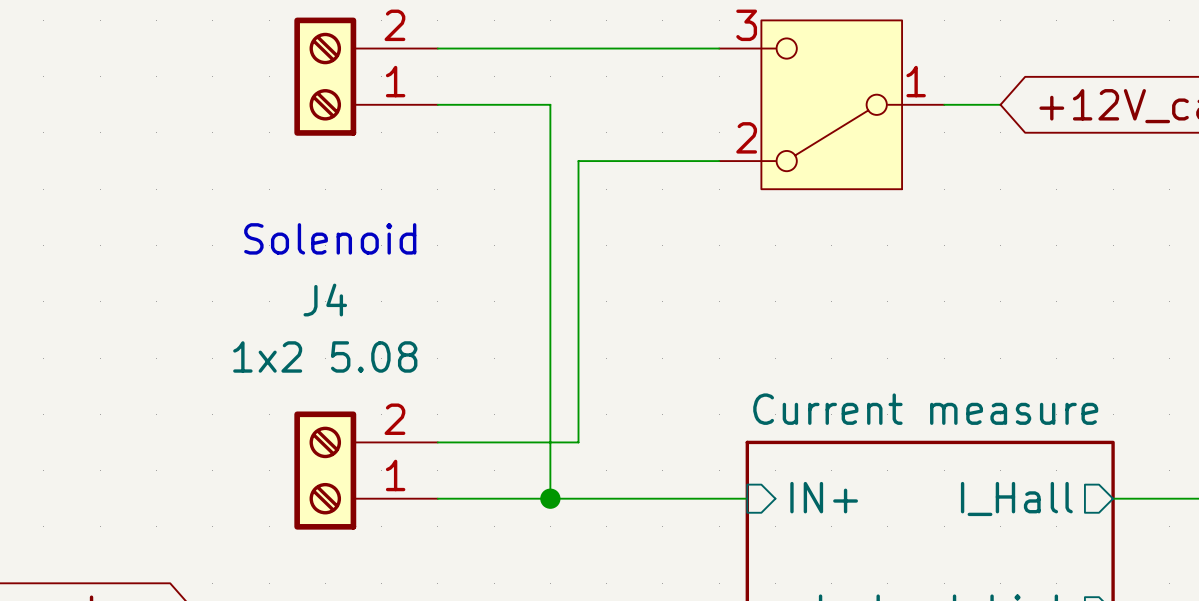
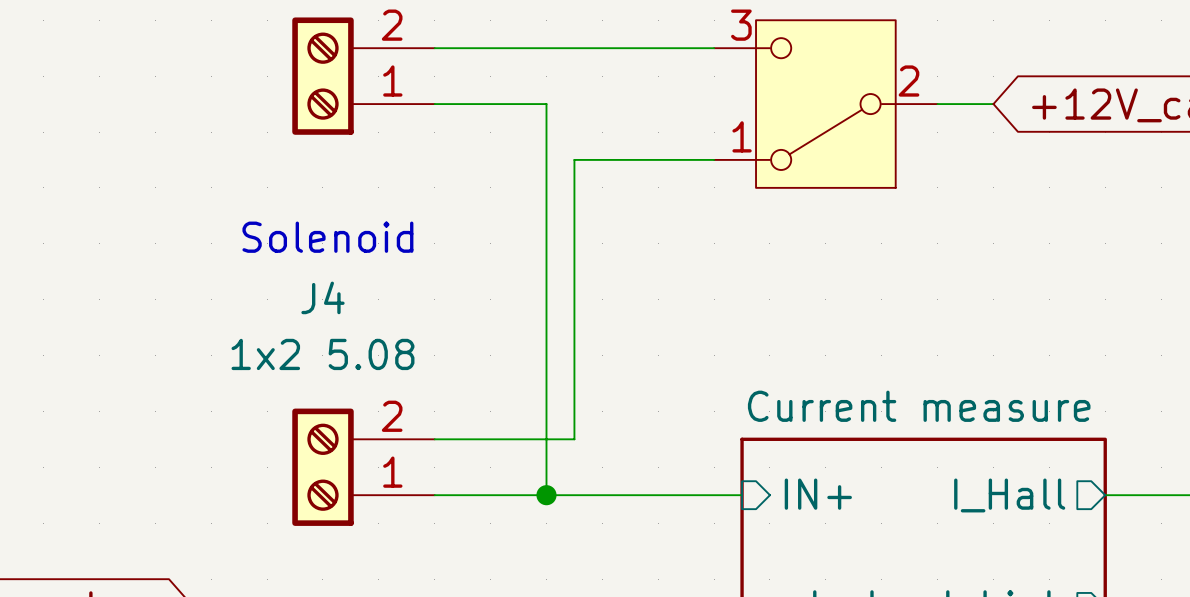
part pin number: 1 (916, 81) -> 2 (909, 81)
part pin number: 2 (746, 137) -> 1 (742, 136)

